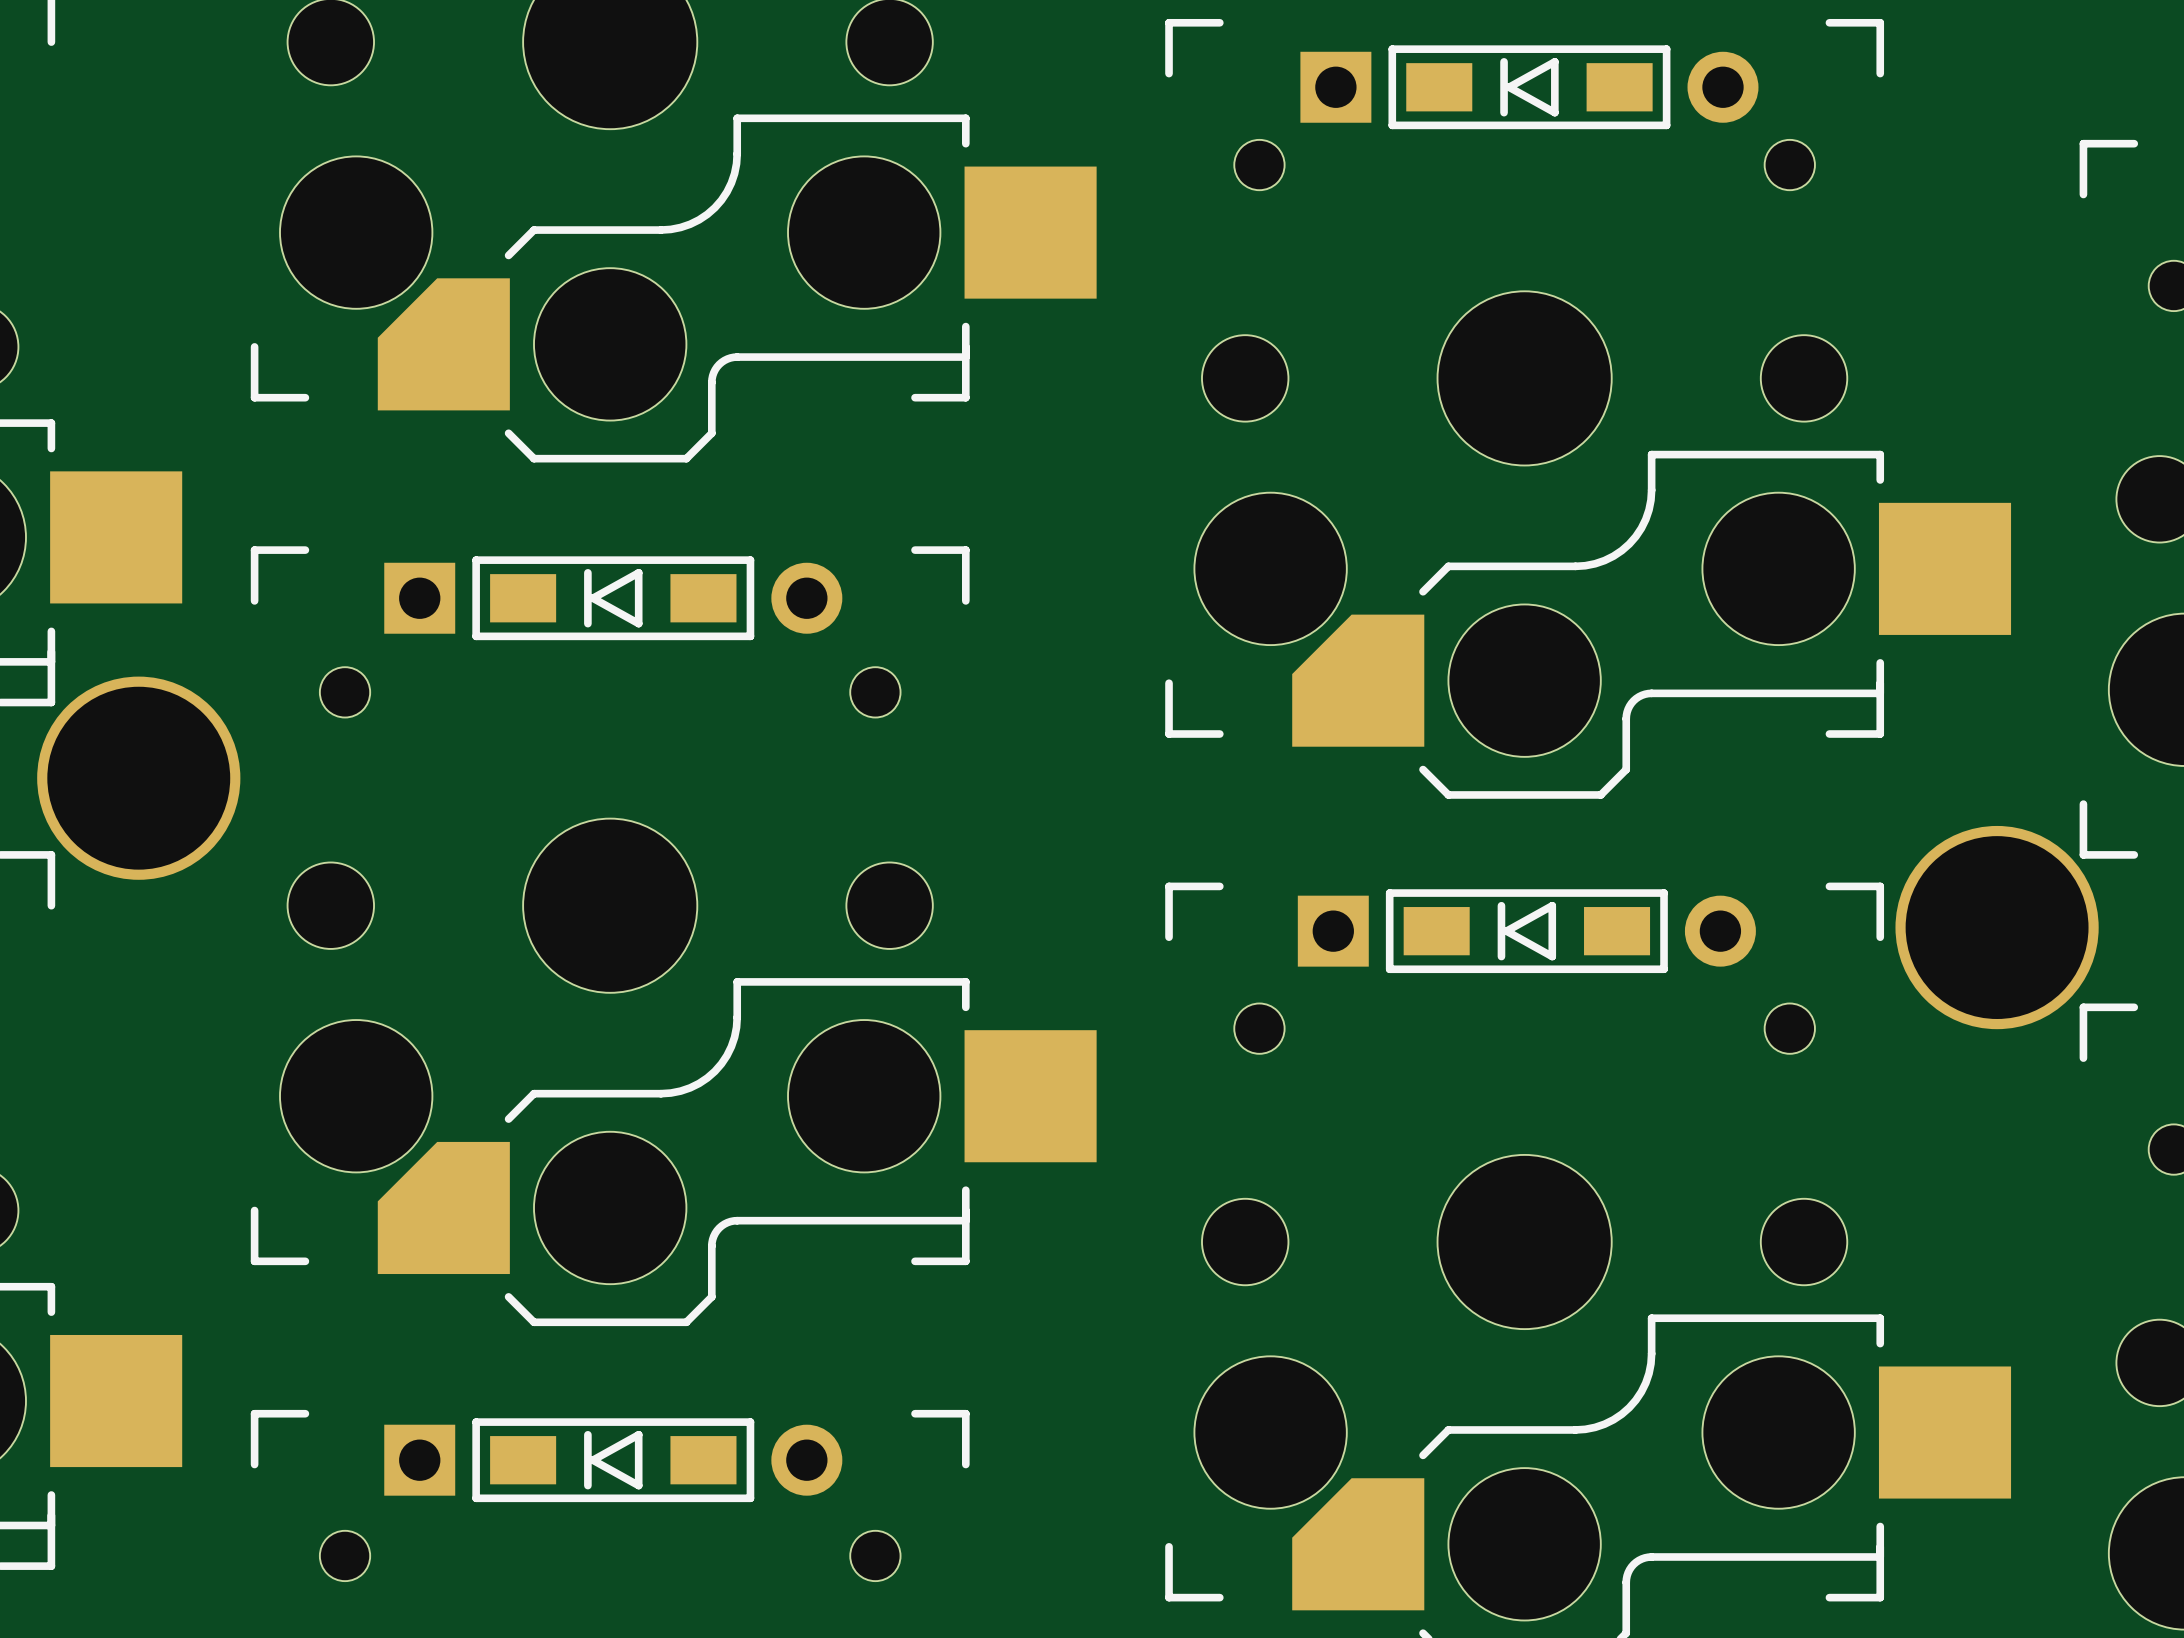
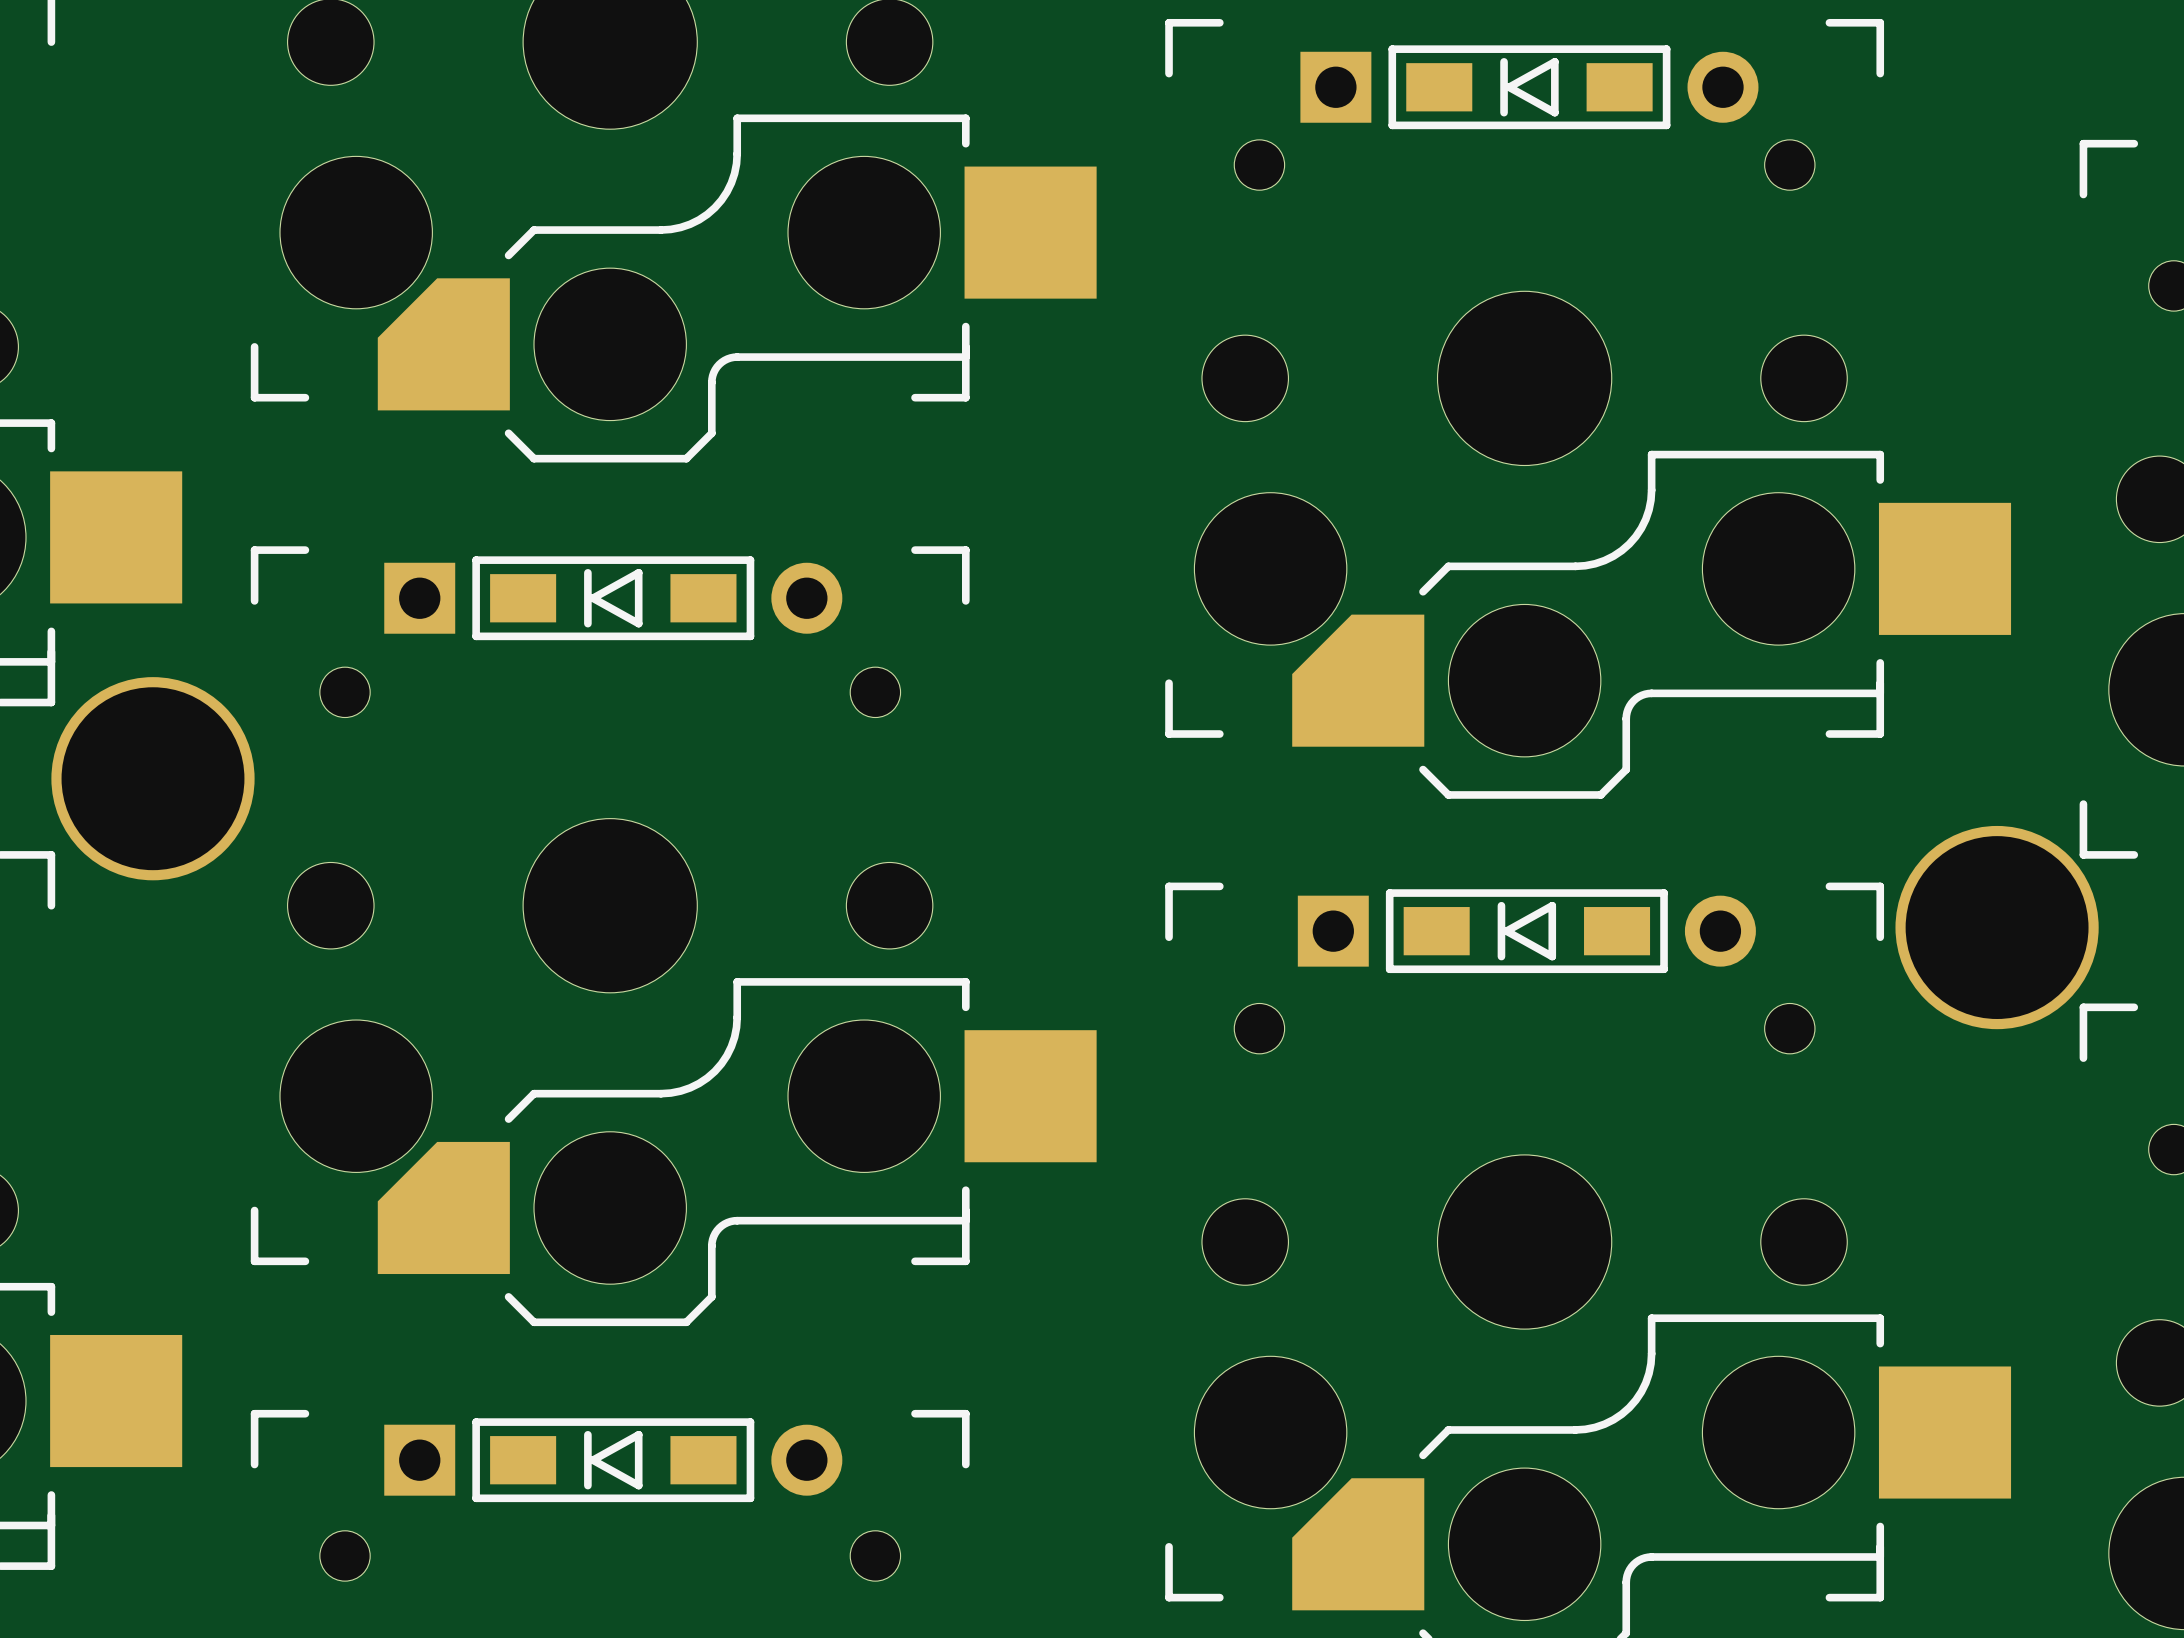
part position: (138, 778) -> (152, 778)

